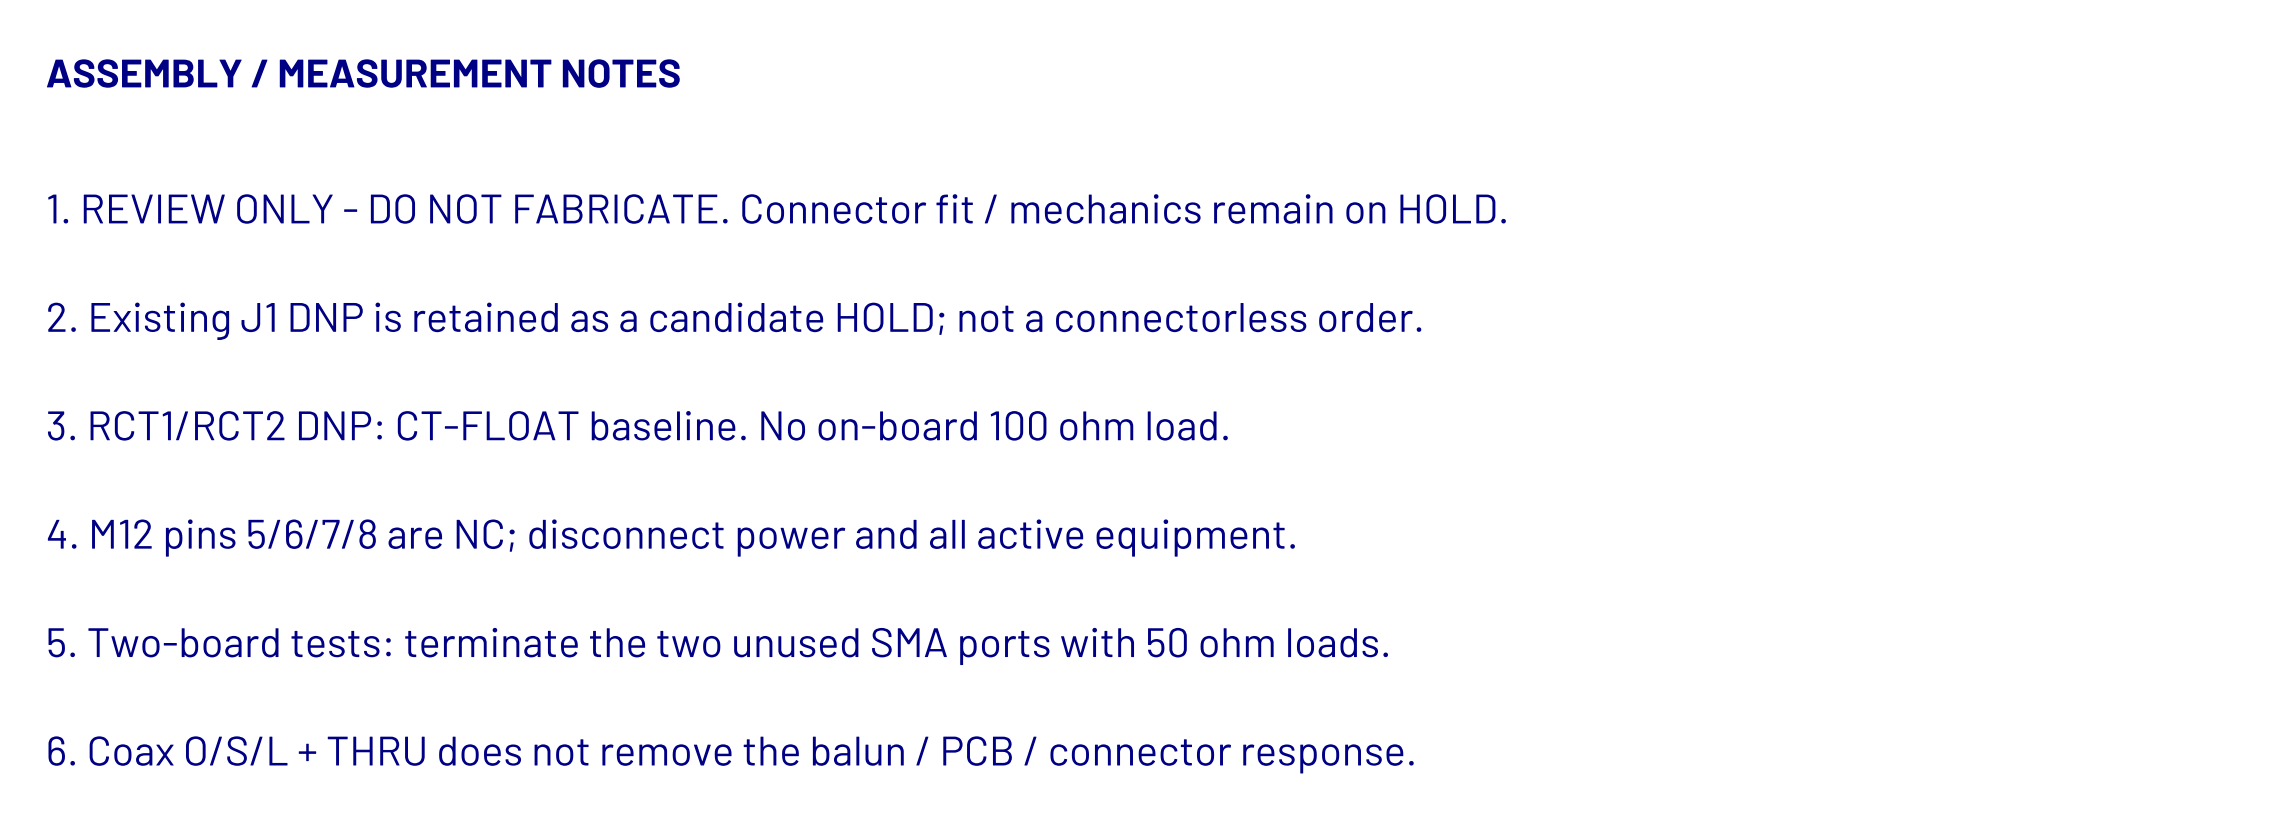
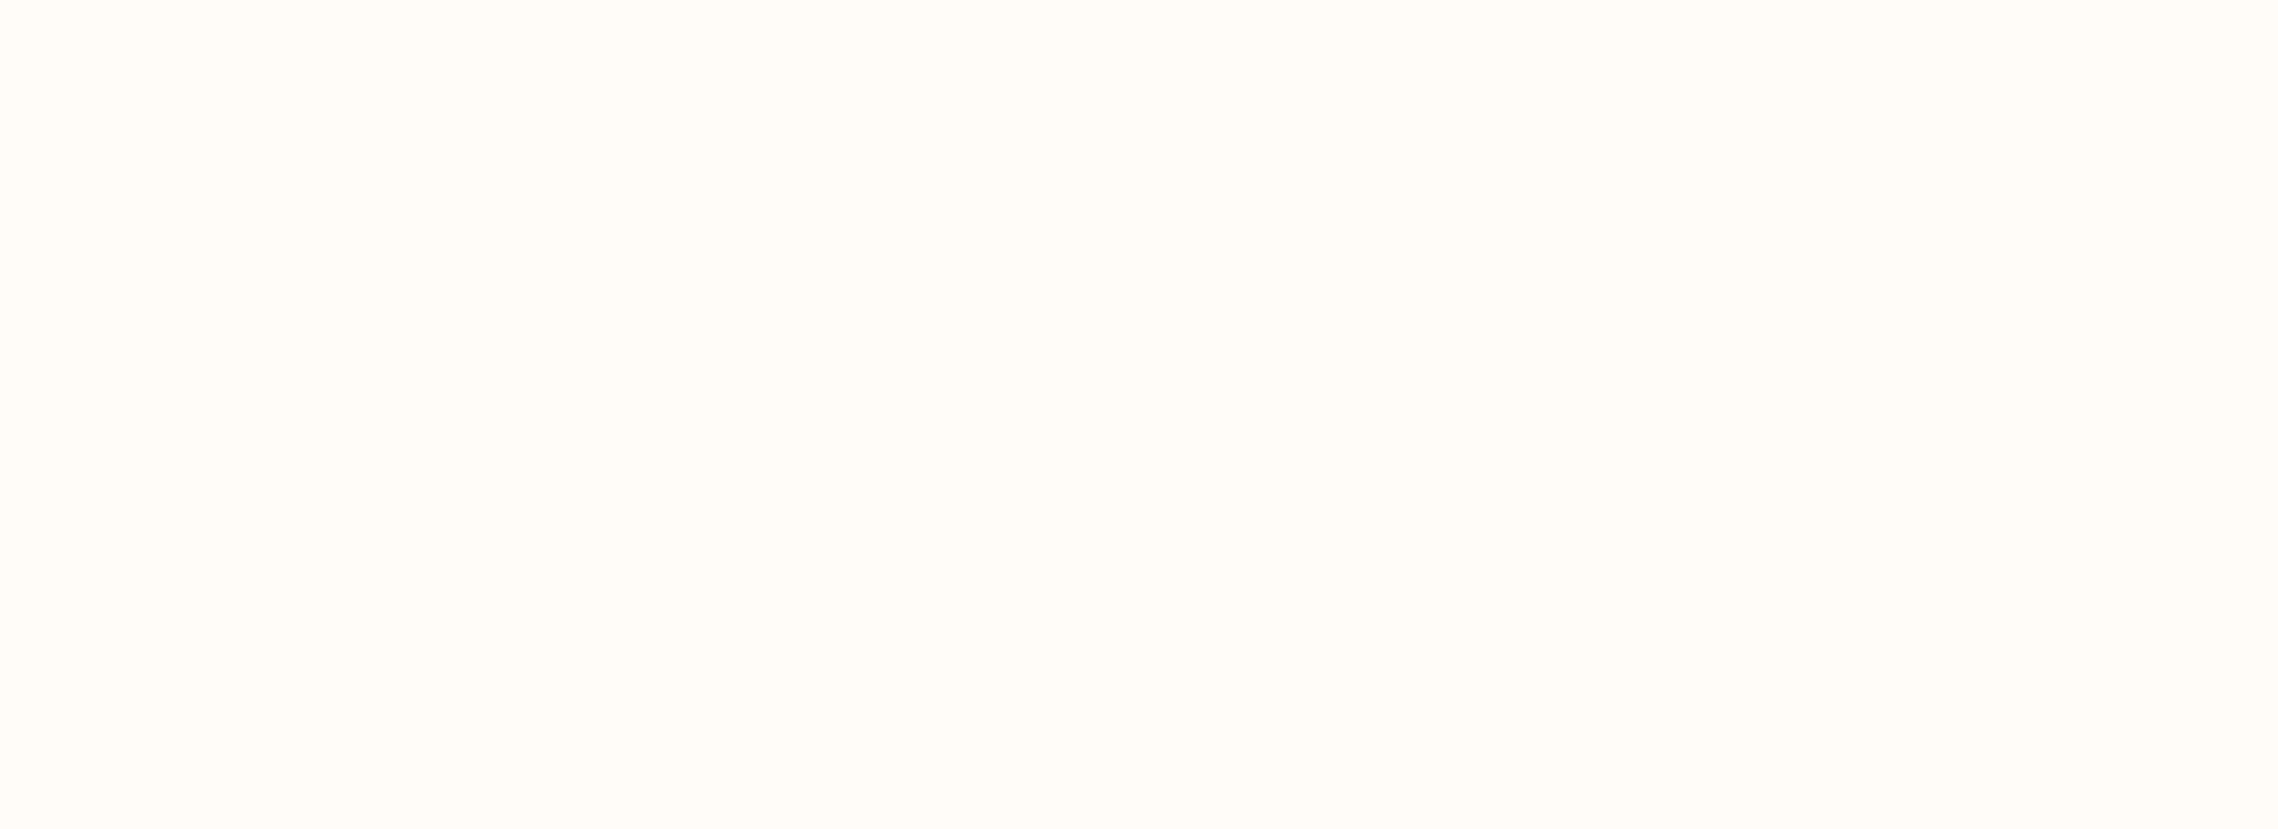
text: ASSEMBLY / MEASUREMENT NOTES (363, 73) -> none
text: 1. REVIEW ONLY - DO NOT FABRICATE. Connector fit / mechanics remain on HOLD. (777, 208) -> none
text: 2. Existing J1 DNP is retained as a candidate HOLD; not a connectorless order. (734, 321) -> none
text: 3. RCT1/RCT2 DNP: CT-FLOAT baseline. No on-board 100 ohm load. (637, 425) -> none
text: 4. M12 pins 5/6/7/8 are NC; disconnect power and all active equipment. (671, 538) -> none
text: 5. Two-board tests: terminate the two unused SMA ports with 50 ohm loads. (718, 646) -> none
text: 6. Coax O/S/L + THRU does not remove the balun / PCB / connector response. (731, 754) -> none

